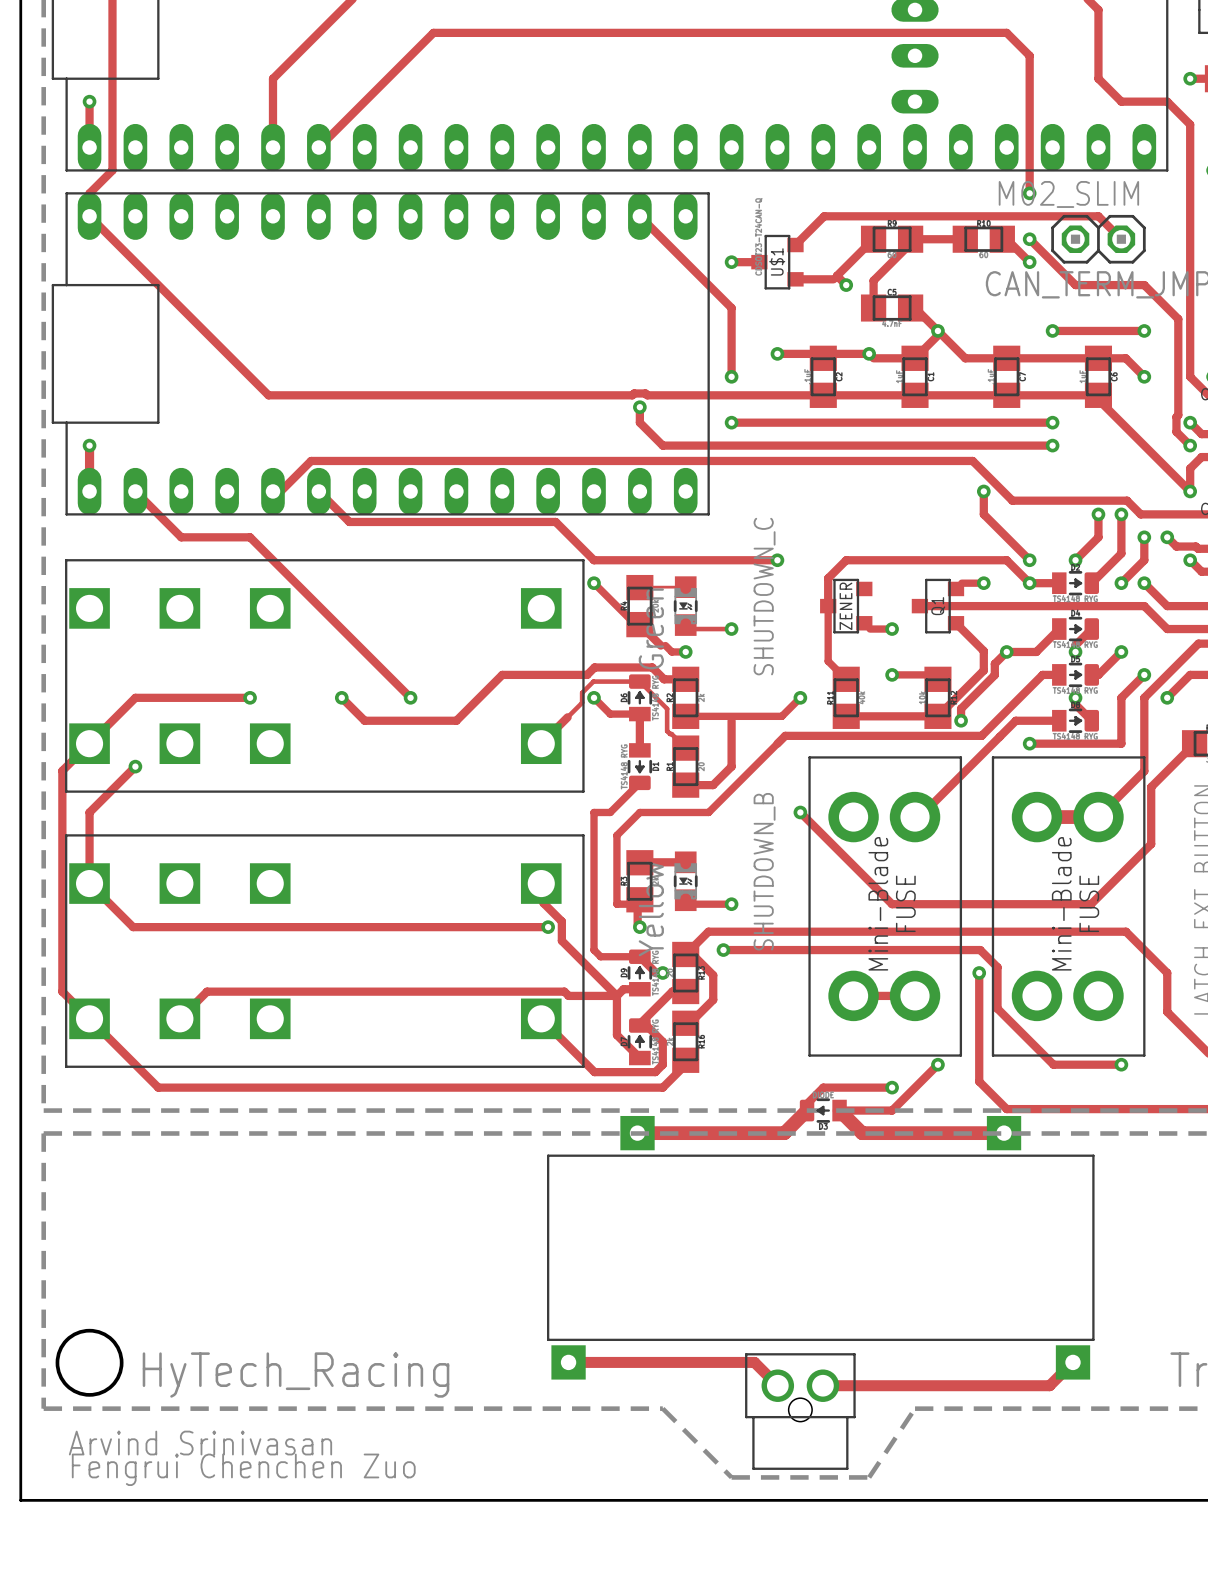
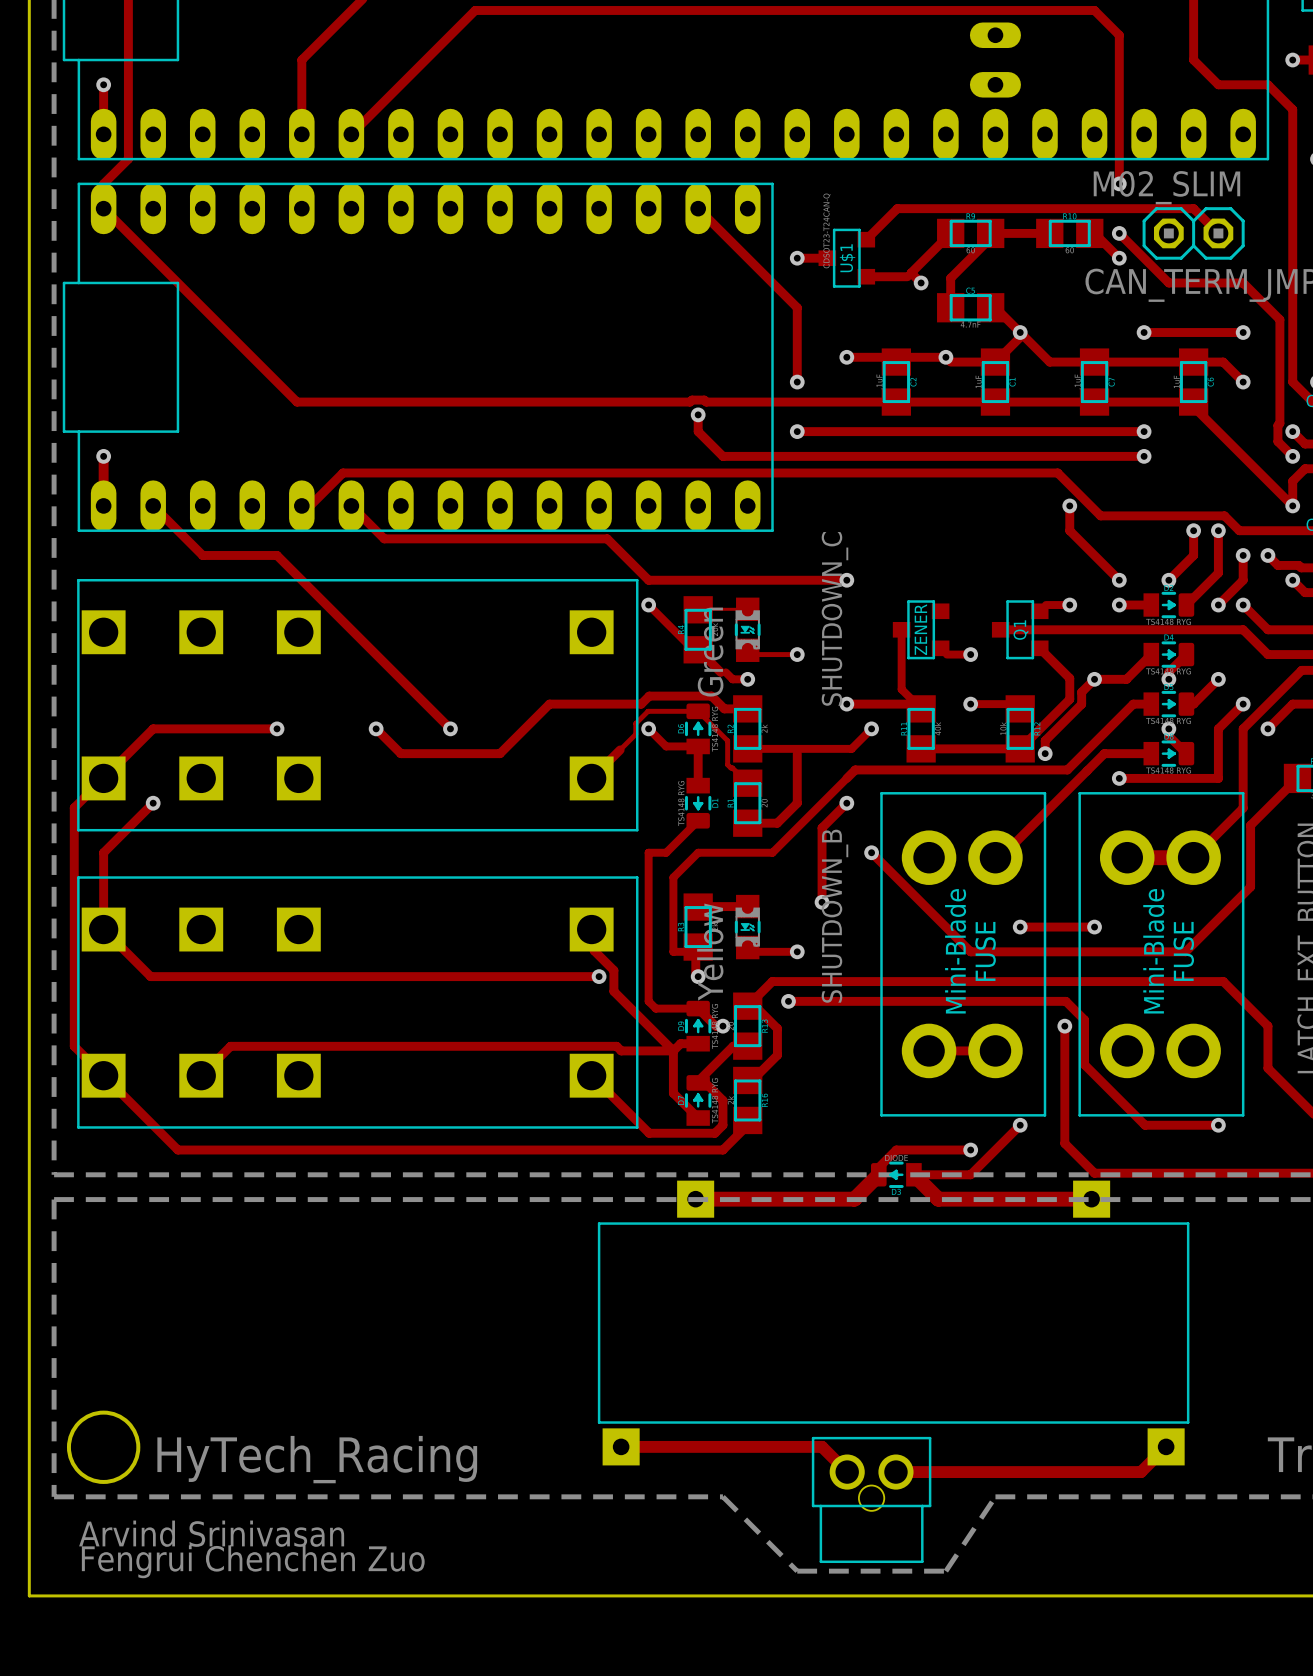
track: (1029, 583) (1006, 560) (846, 560) (828, 578) (828, 606) (823, 601) -> none
track: none -> (846, 704) (916, 704)
via: none -> (846, 704)
track: none -> (846, 803) (822, 827) (822, 902)
via: none -> (846, 803)
via: none -> (822, 902)
track: none -> (1020, 927) (1094, 927)
via: none -> (1020, 927)
via: none -> (1094, 927)

